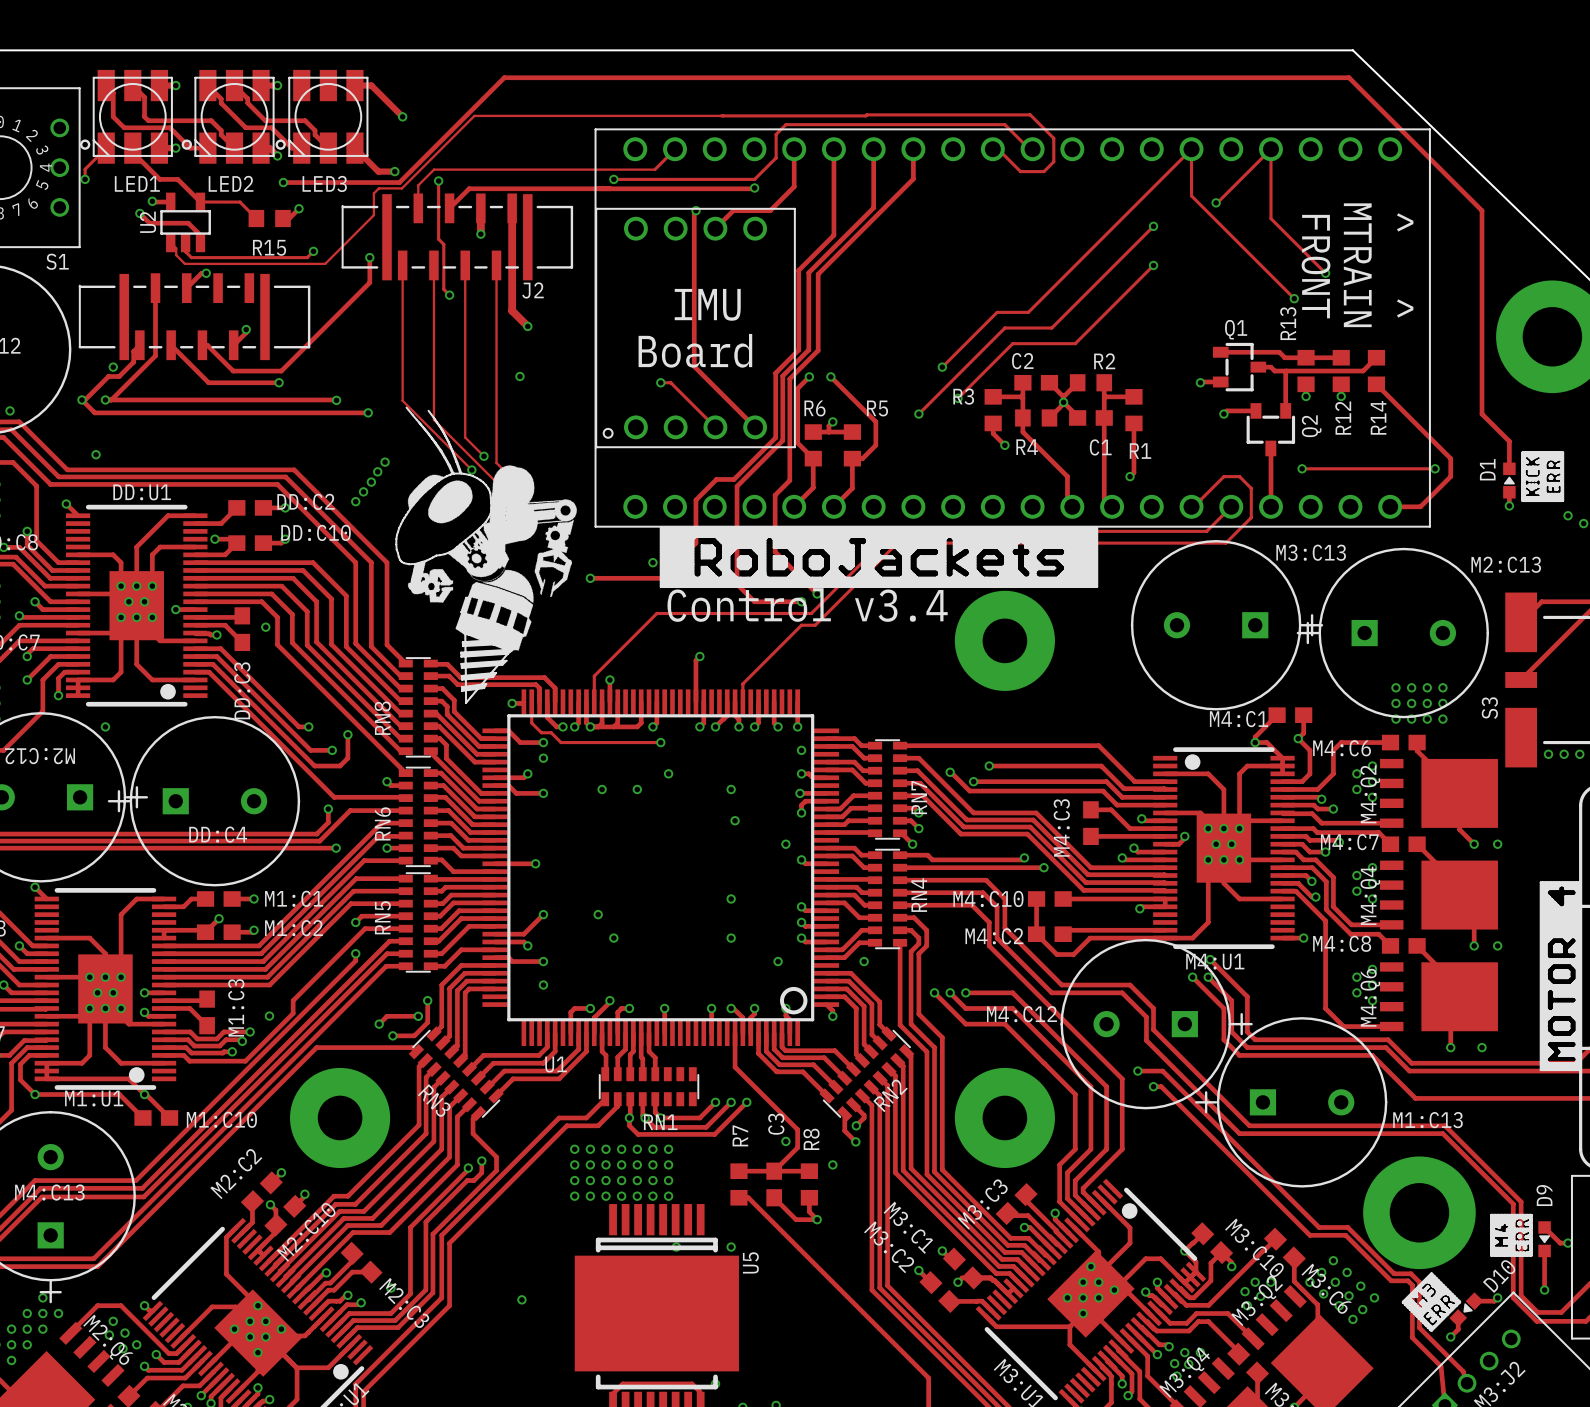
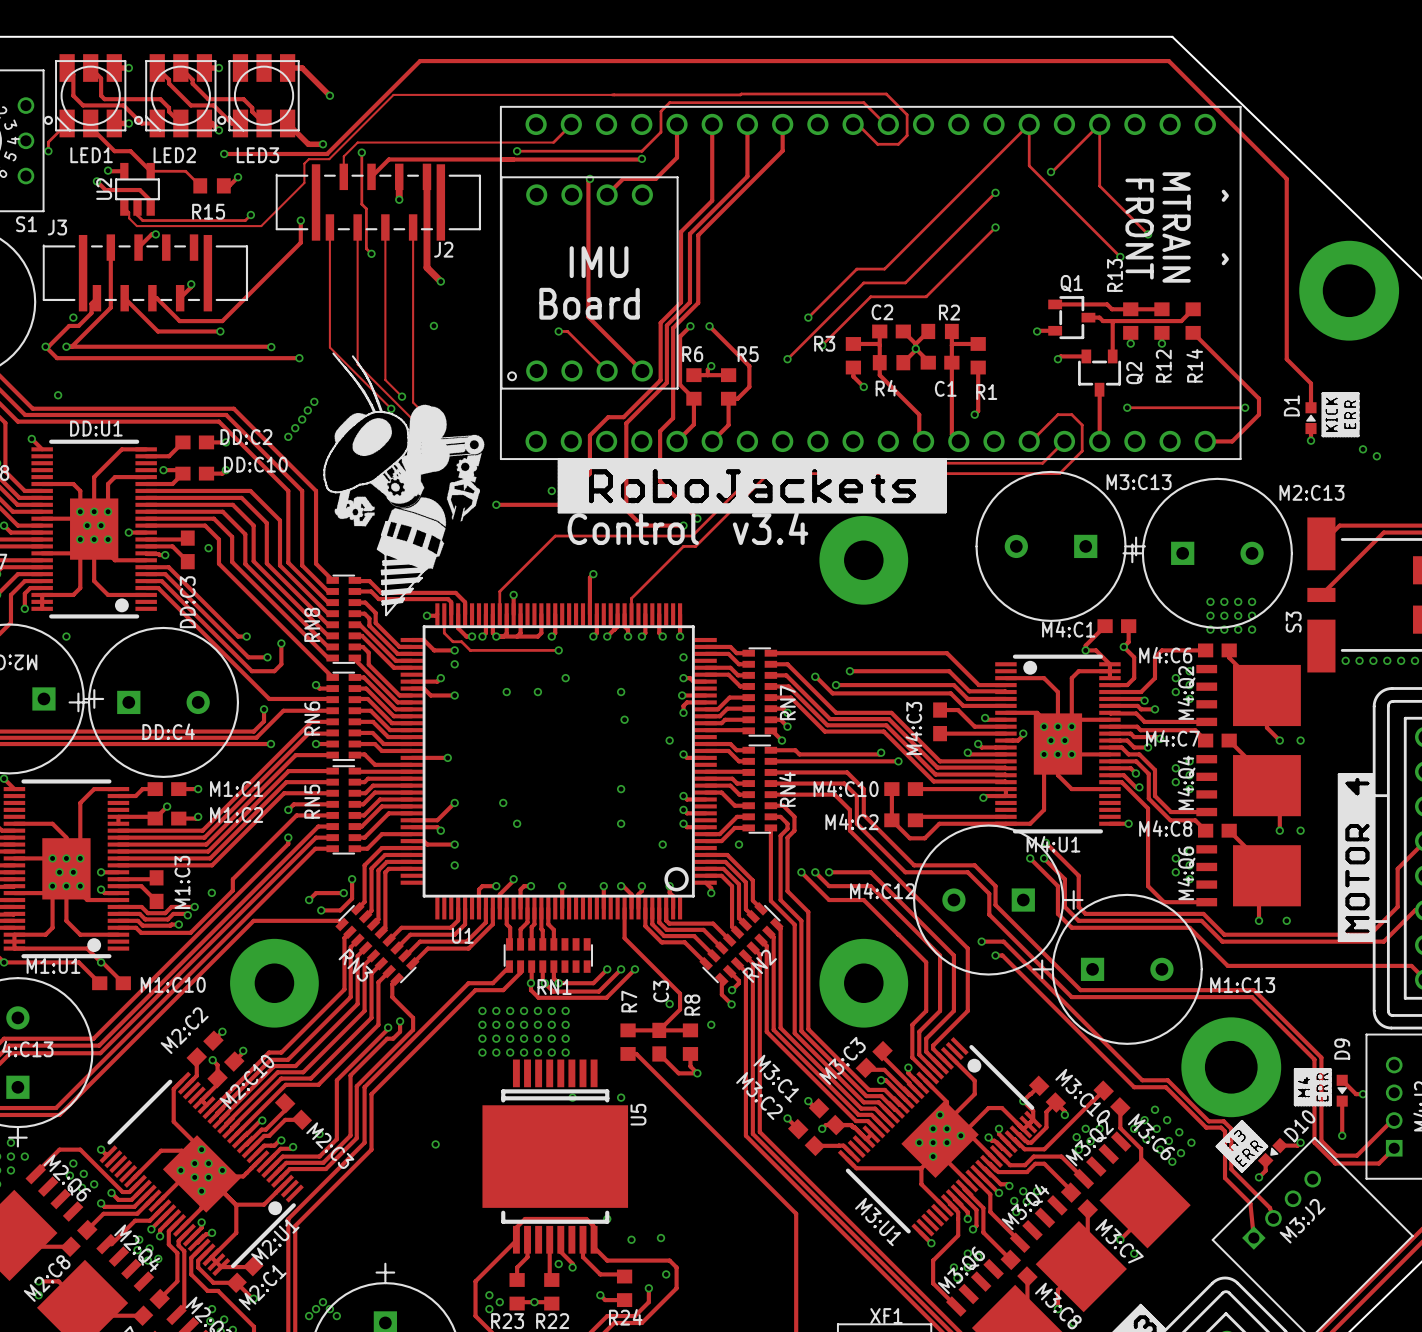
text: none -> J3 (57, 227)

